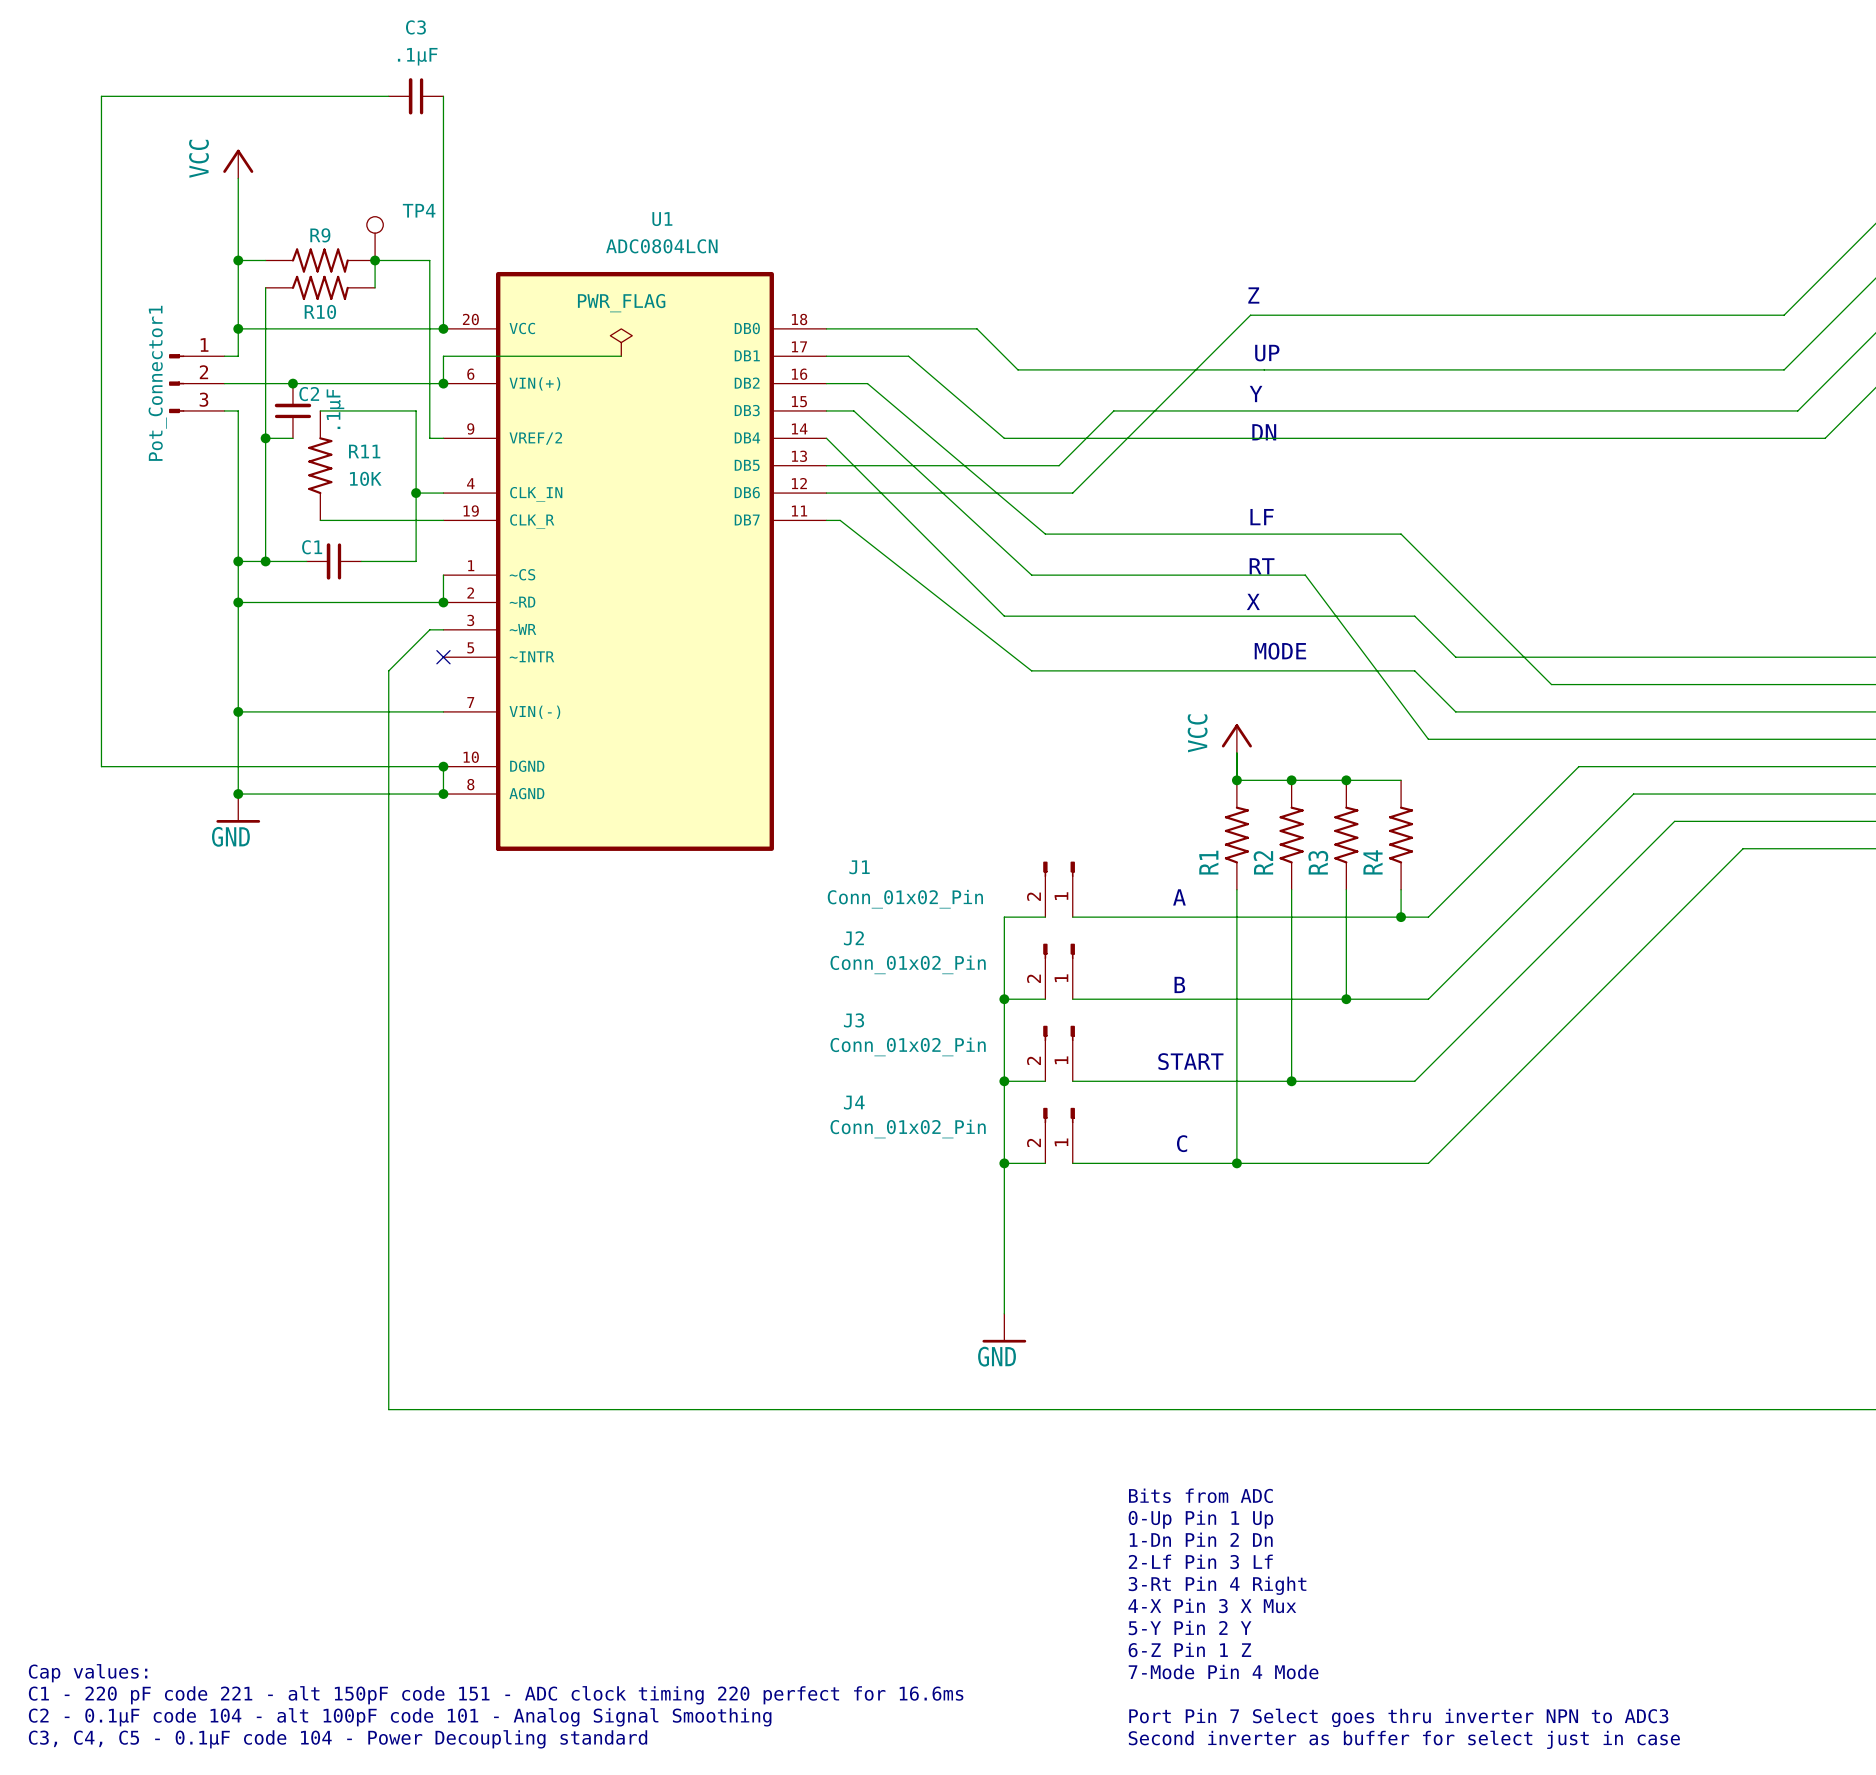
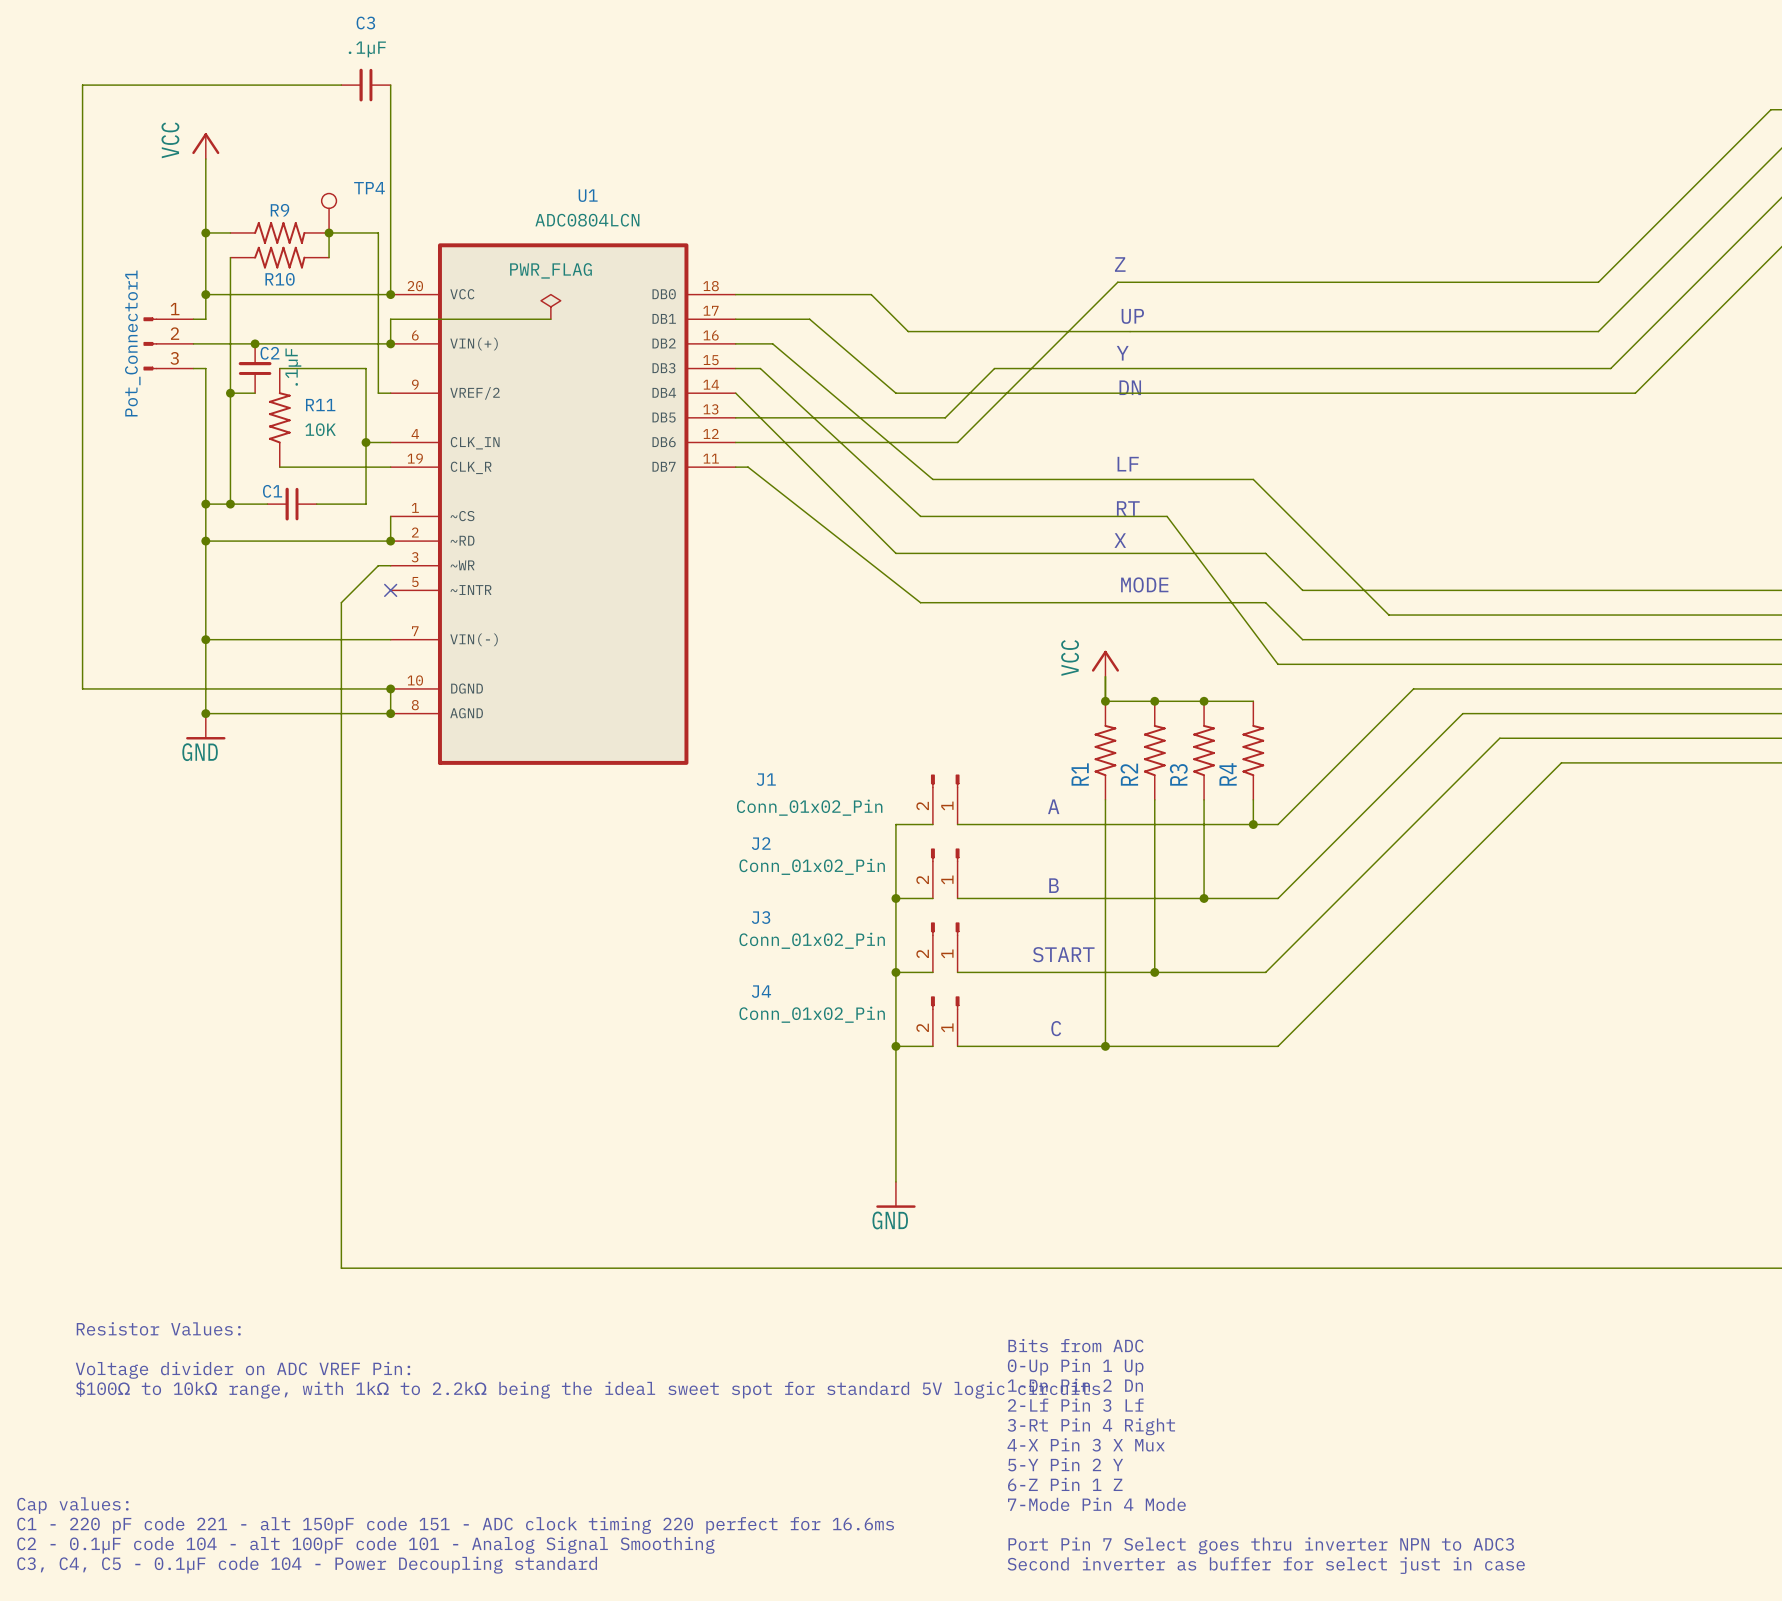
text: none -> Resistor Values: (158, 1328)
text: none -> Voltage divider on ADC VREF Pin: (243, 1370)
text: none -> $100Ω to 10kΩ range, with 1kΩ to 2.2kΩ being the ideal sweet spot for standard 5V logic circuits (588, 1389)

